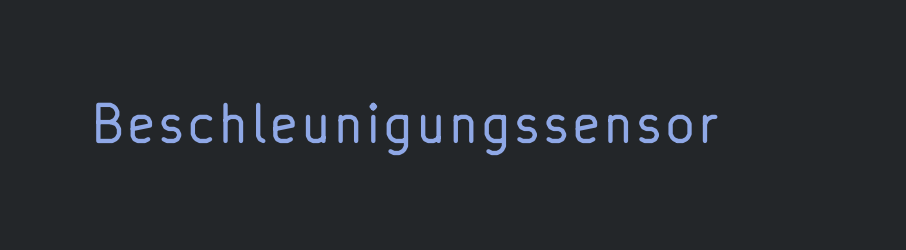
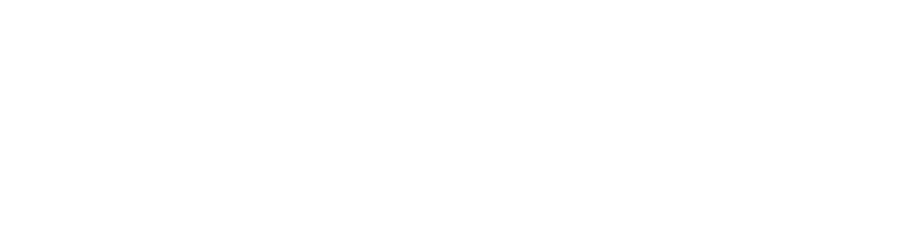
text: Beschleunigungssensor (406, 128) -> none

